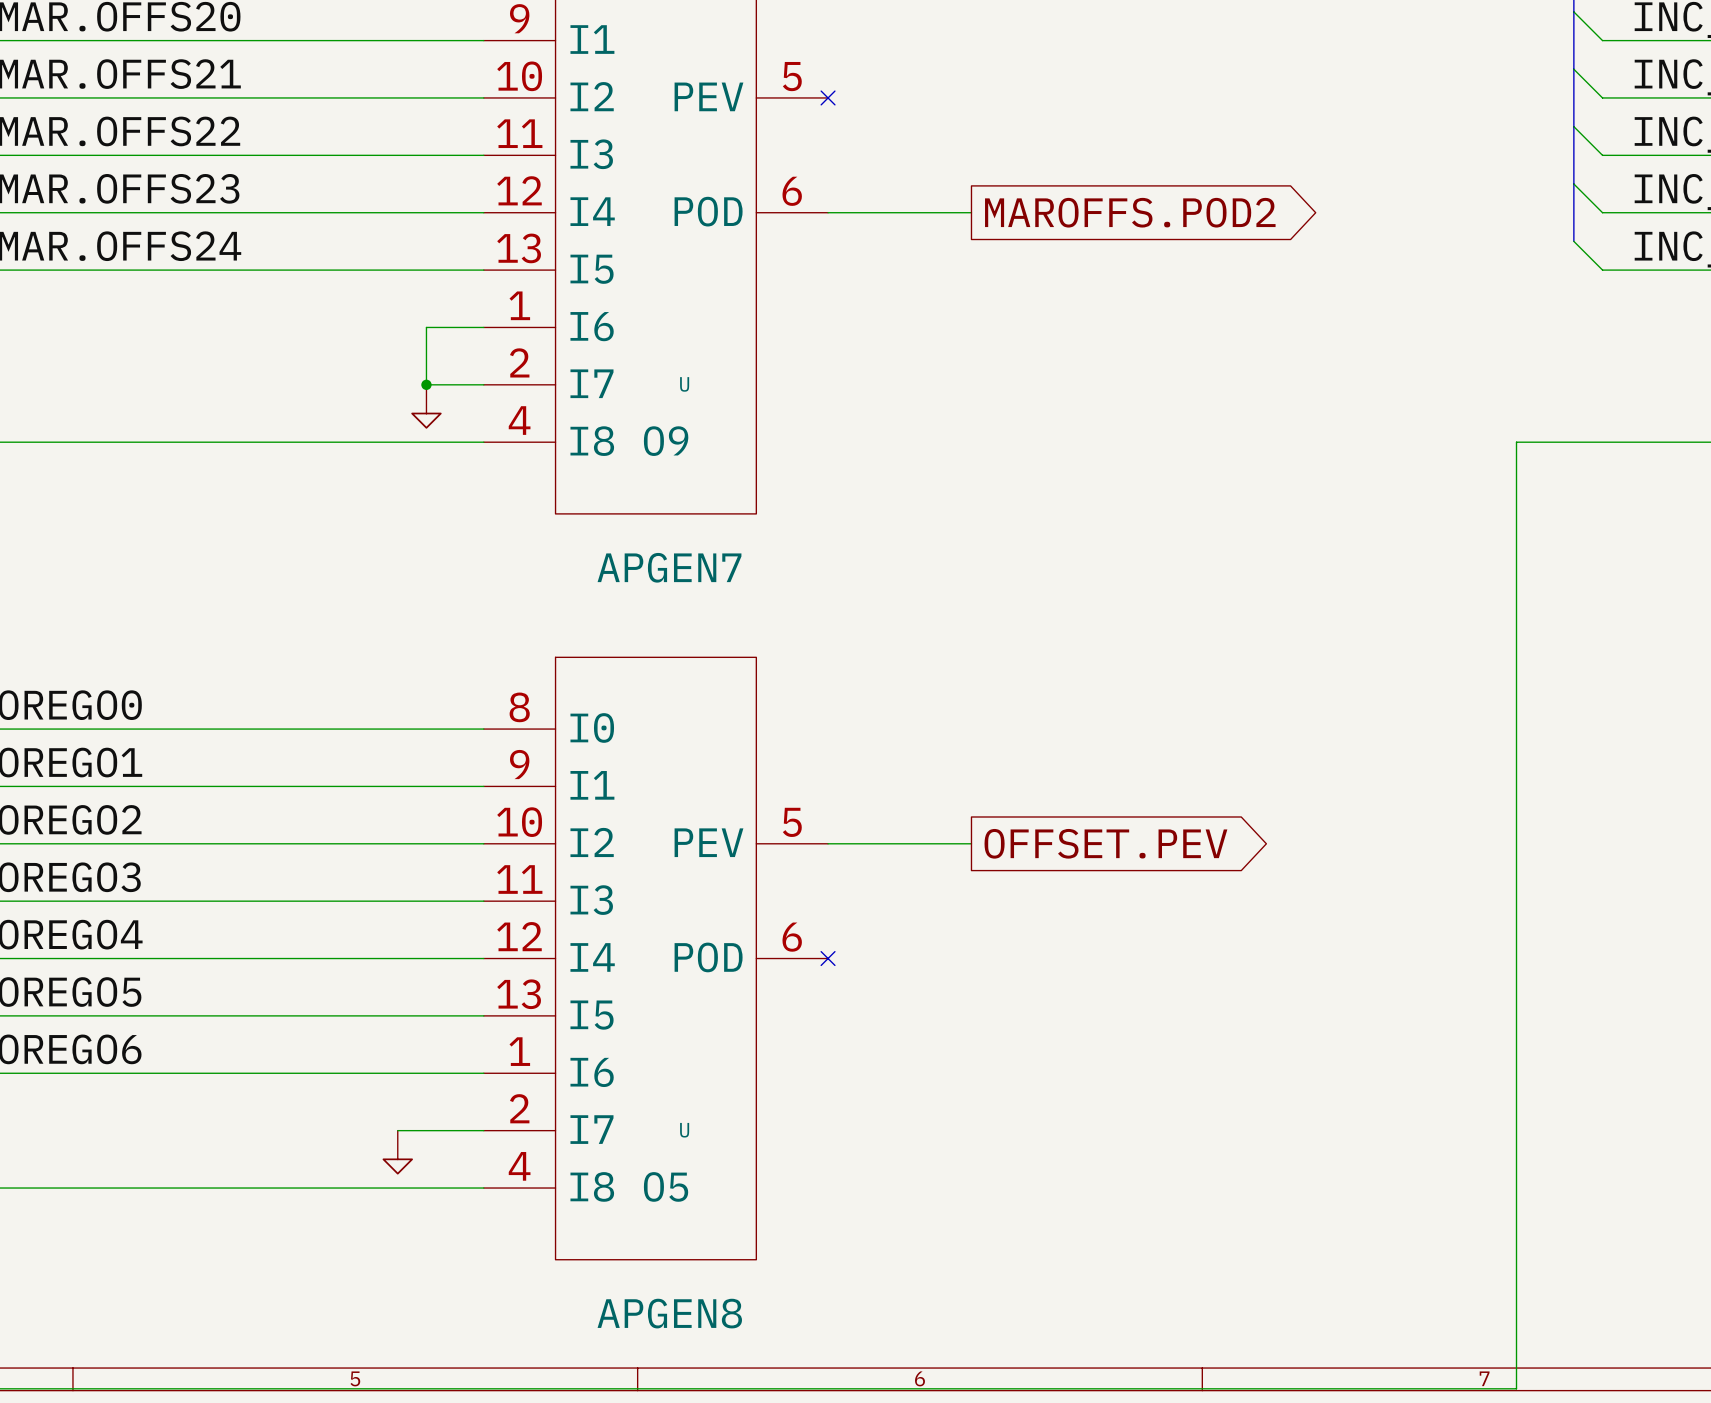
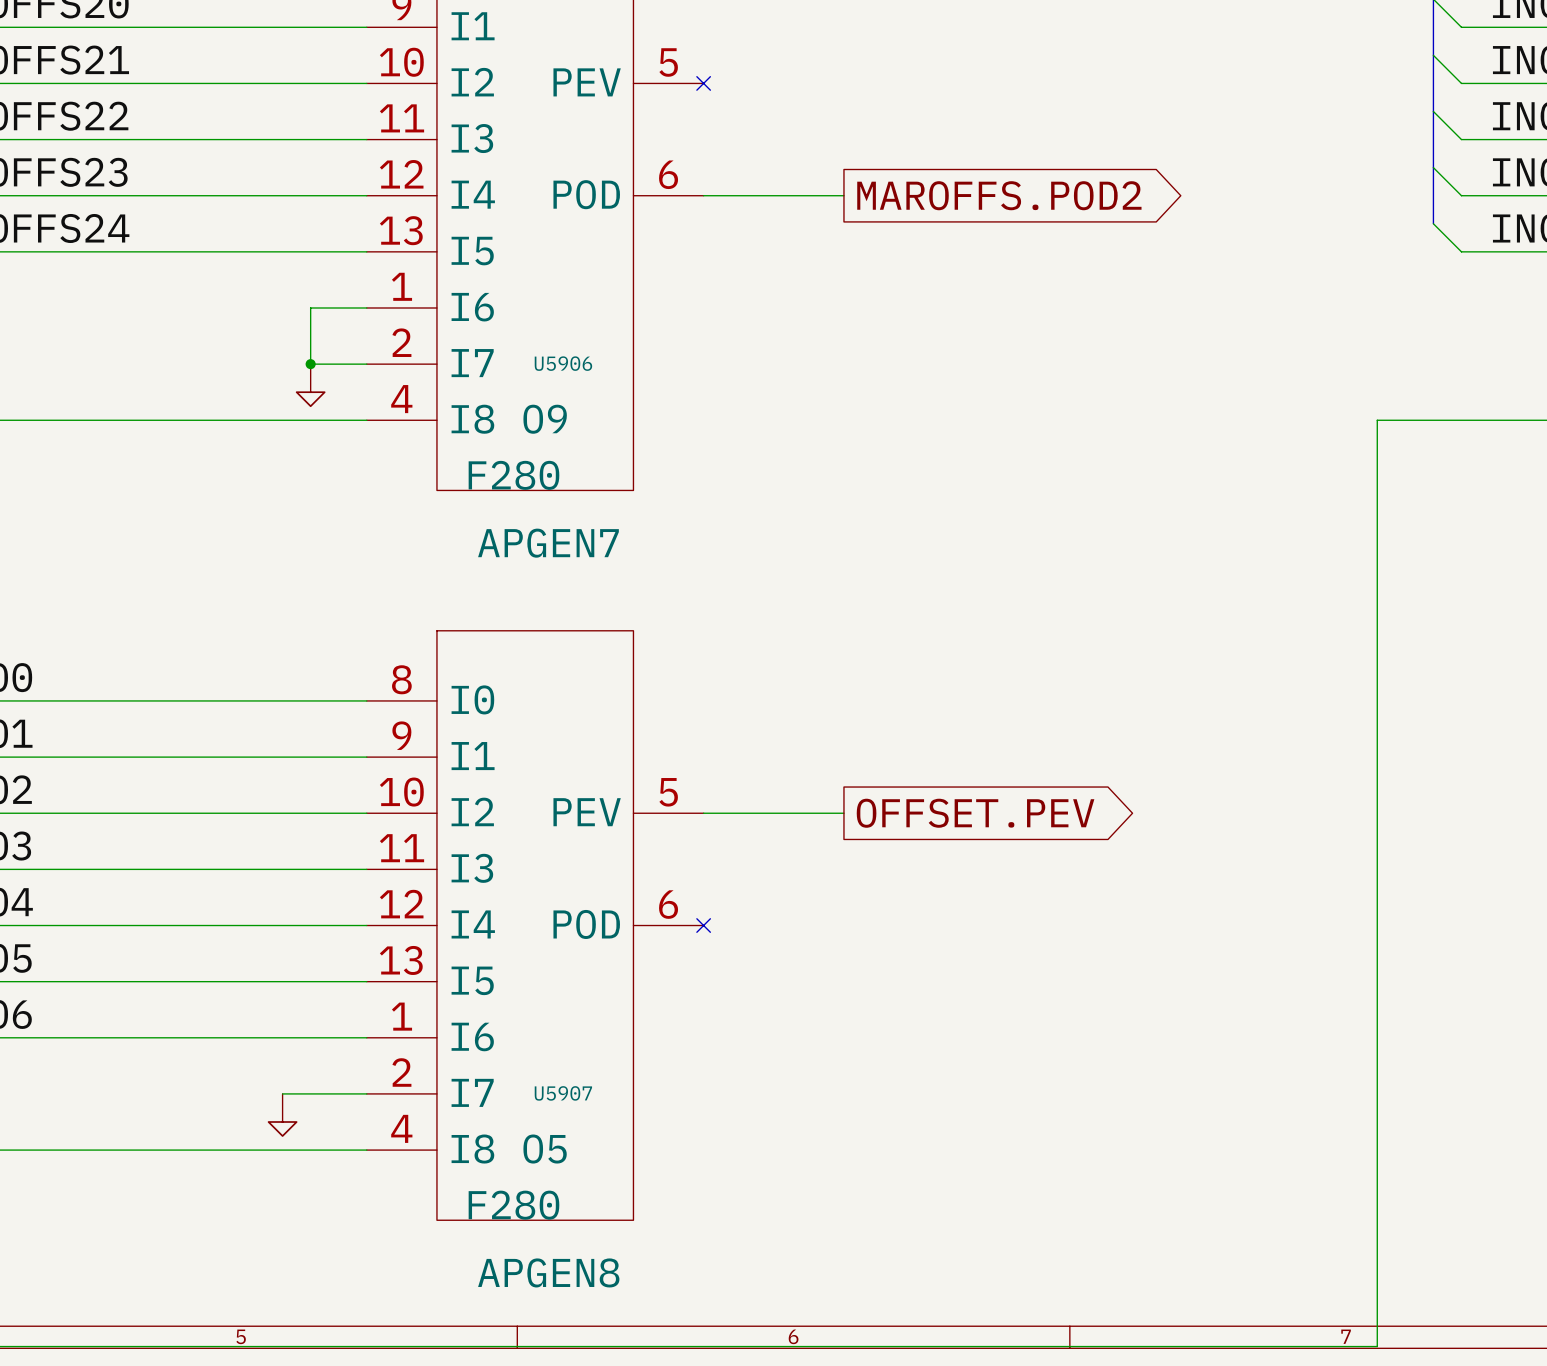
U name: U (684, 384) -> U5906 (563, 363)
U value: none -> F280 (513, 475)
U name: U (684, 1130) -> U5907 (563, 1093)
U value: none -> F280 (513, 1205)

